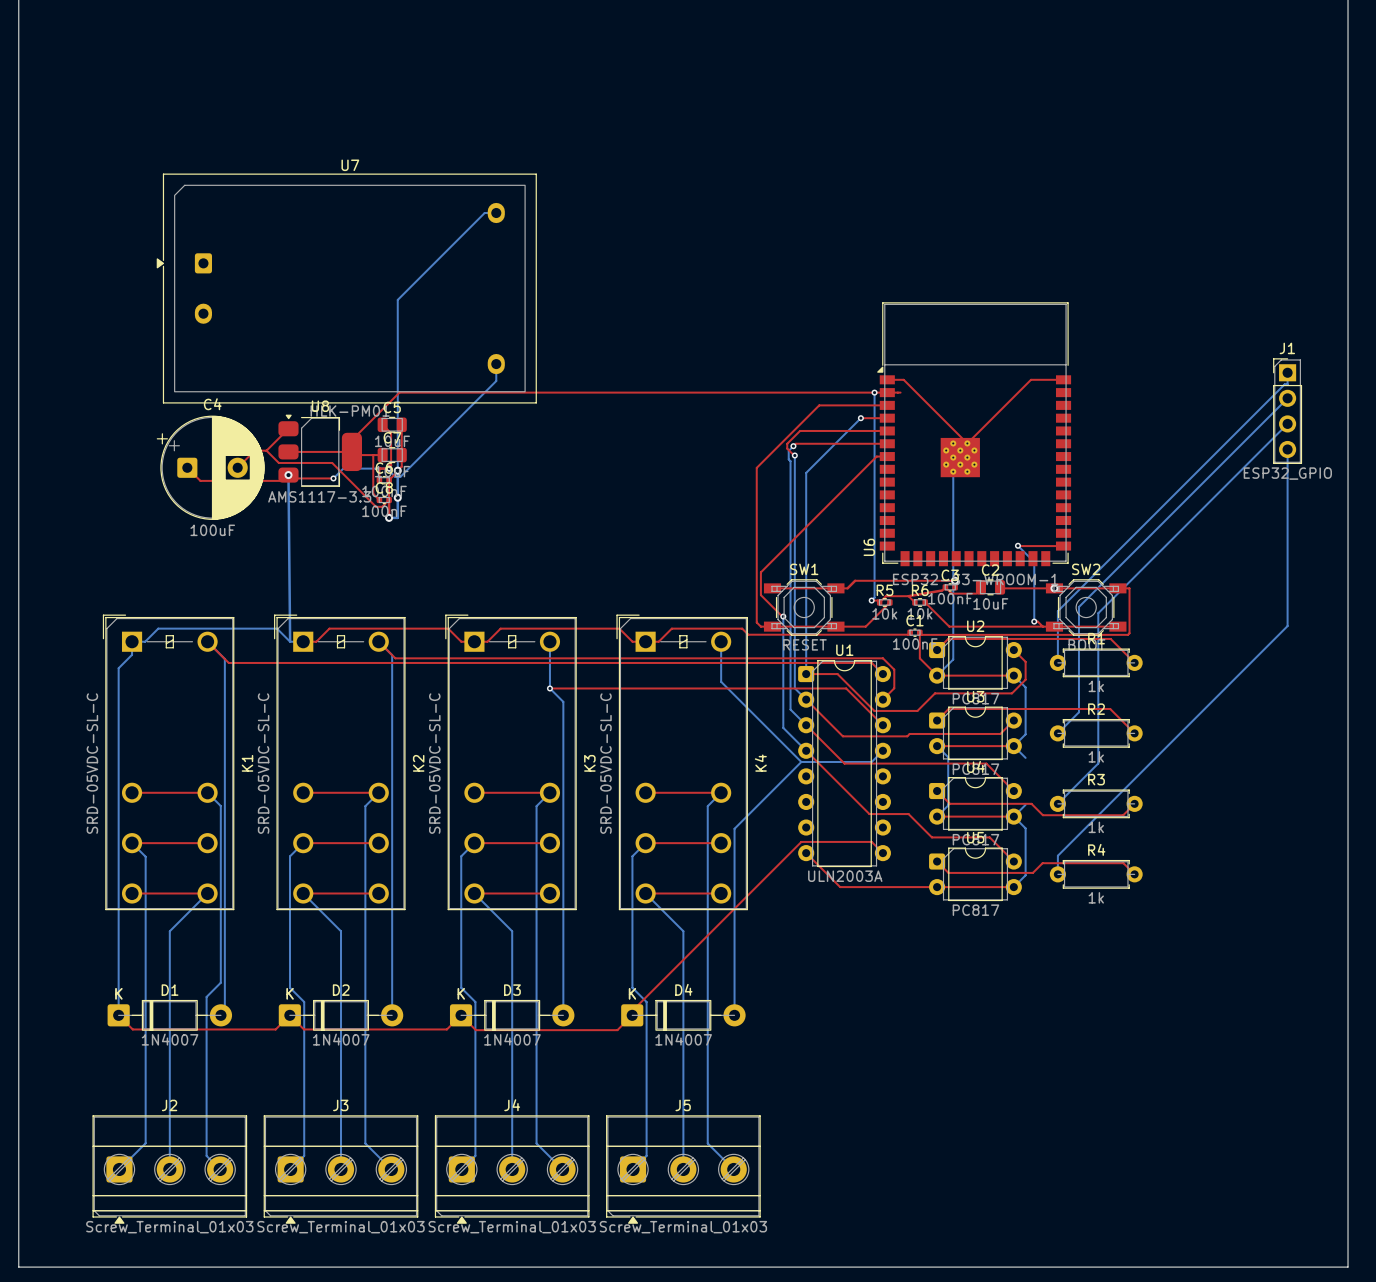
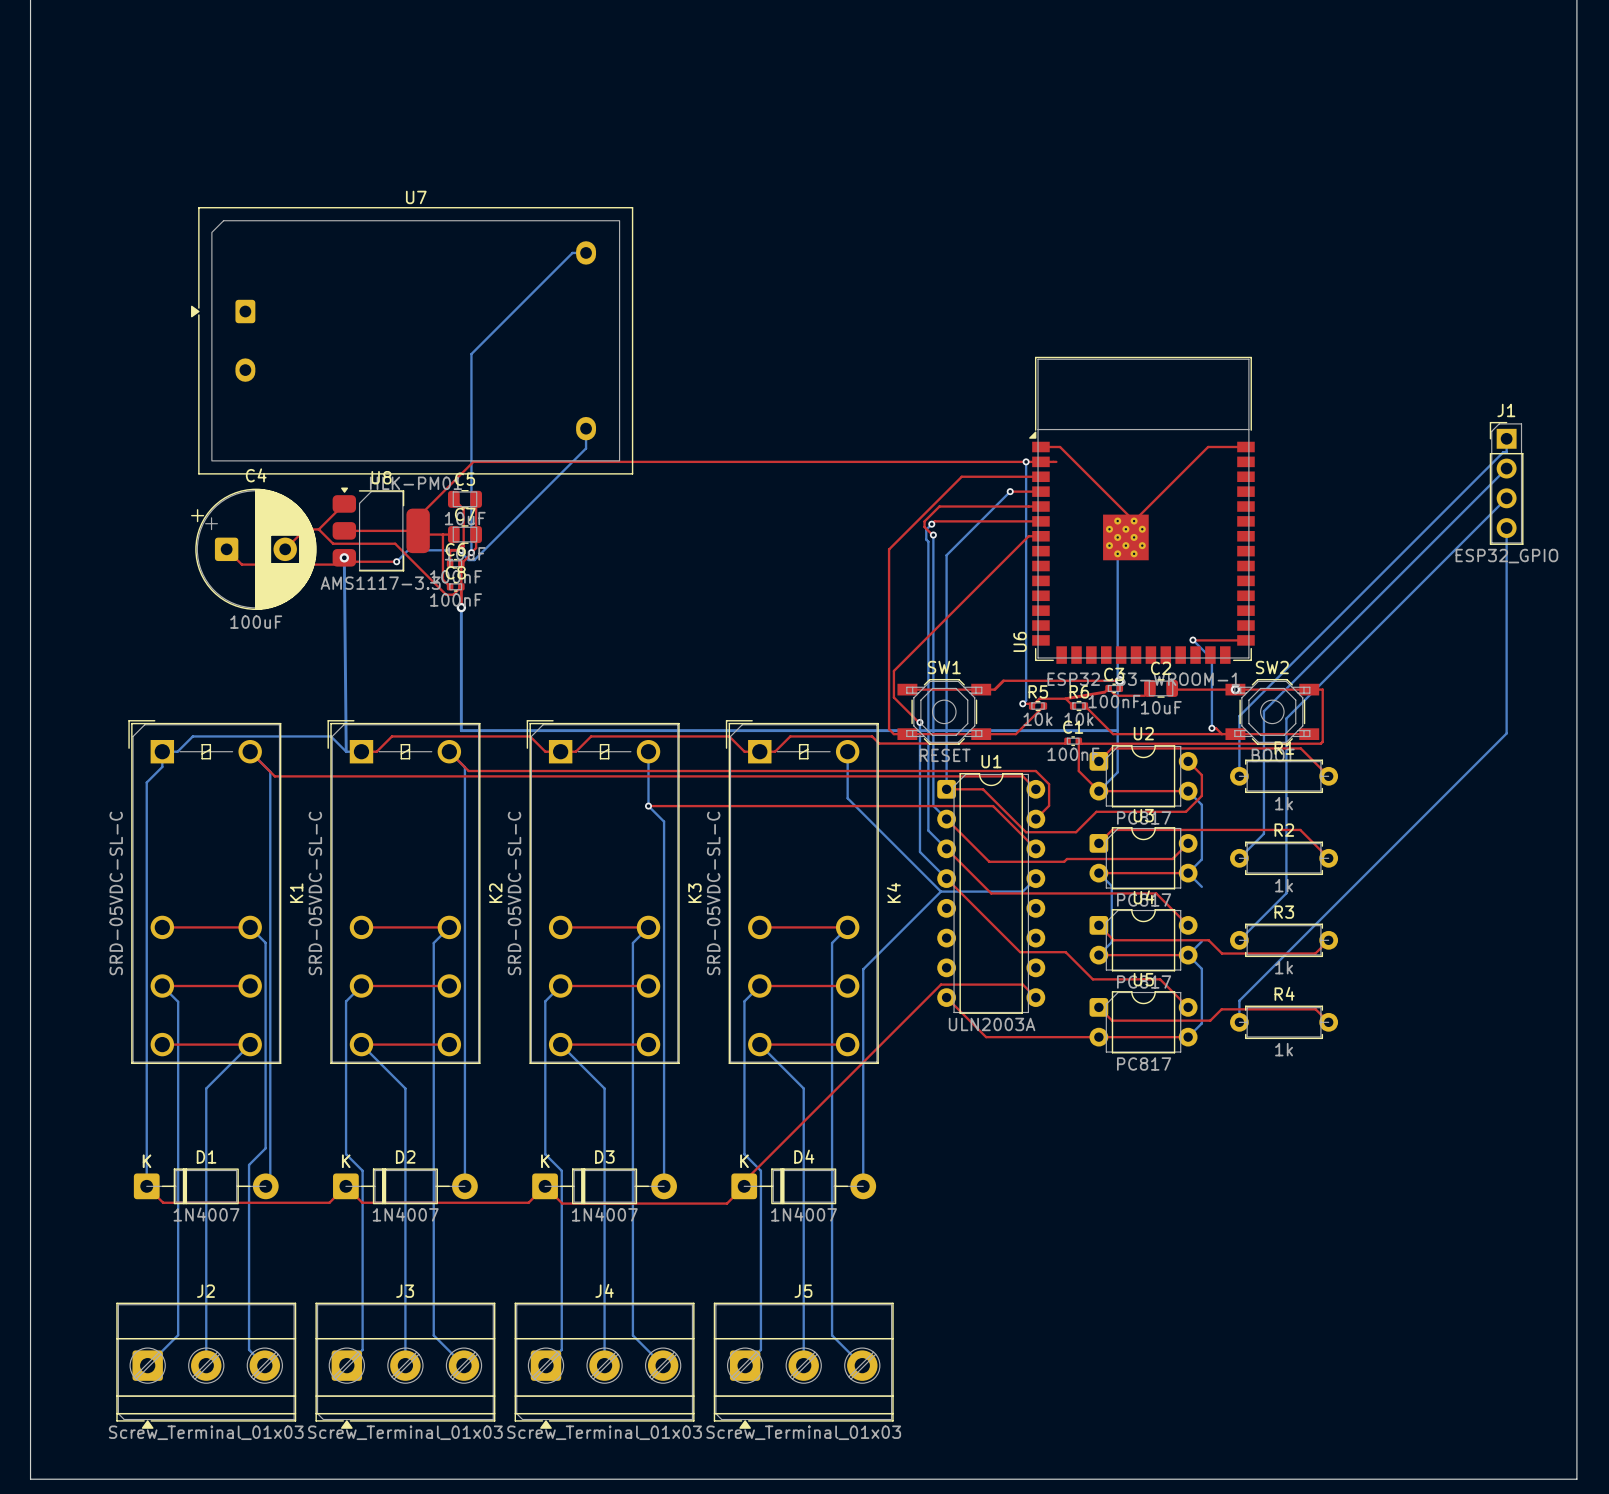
bottom track: (397, 470) (397, 517) (389, 517) -> (1117, 730) (461, 730) (461, 607)
via: (397, 470) -> none
via: (397, 497) -> none

